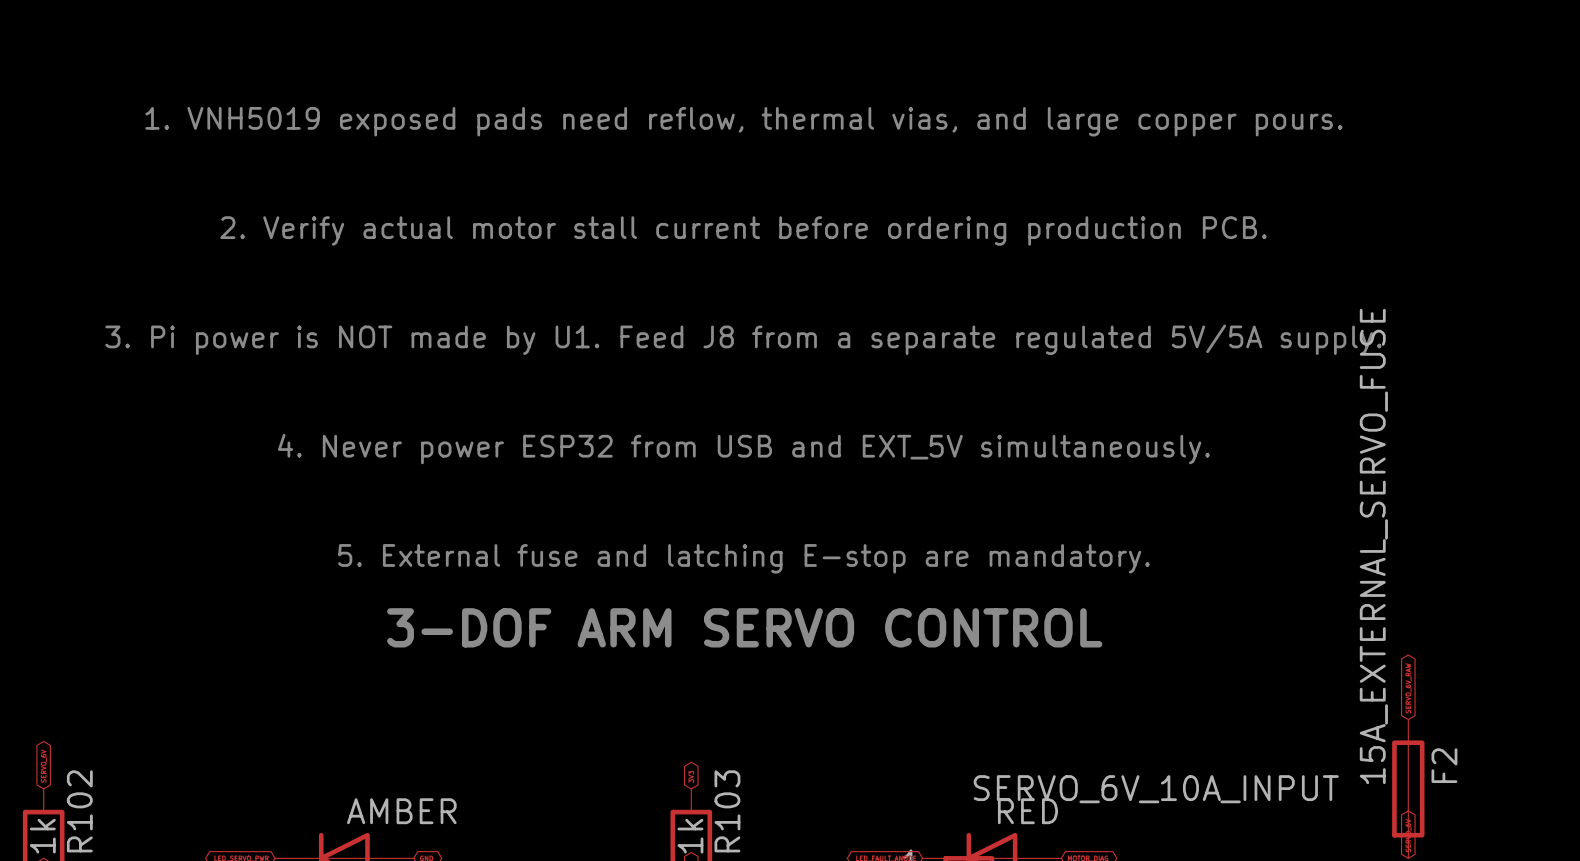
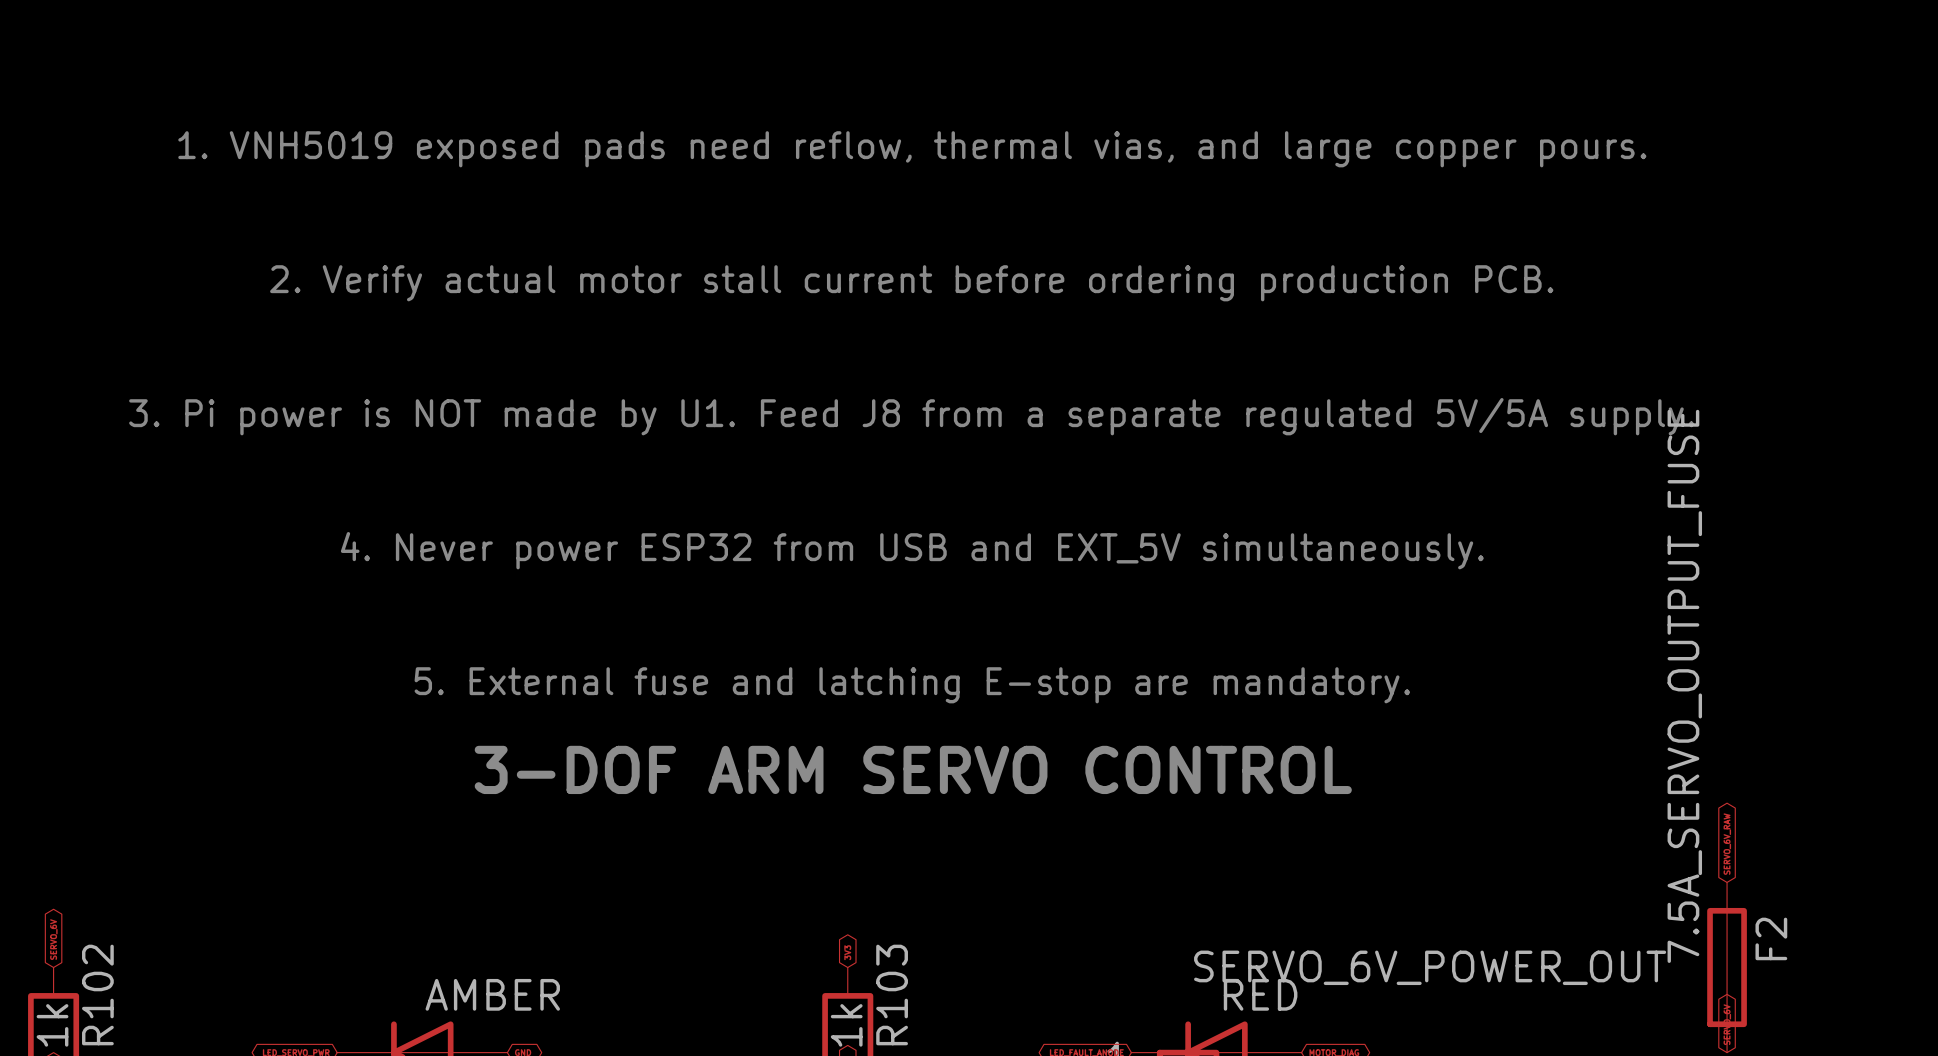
F2 value: 15A_EXTERNAL_SERVO_FUSE (1373, 546) -> 7.5A_SERVO_OUTPUT_FUSE (1684, 686)
part value: SERVO_6V_10A_INPUT (1156, 789) -> SERVO_6V_POWER_OUT (1430, 967)

